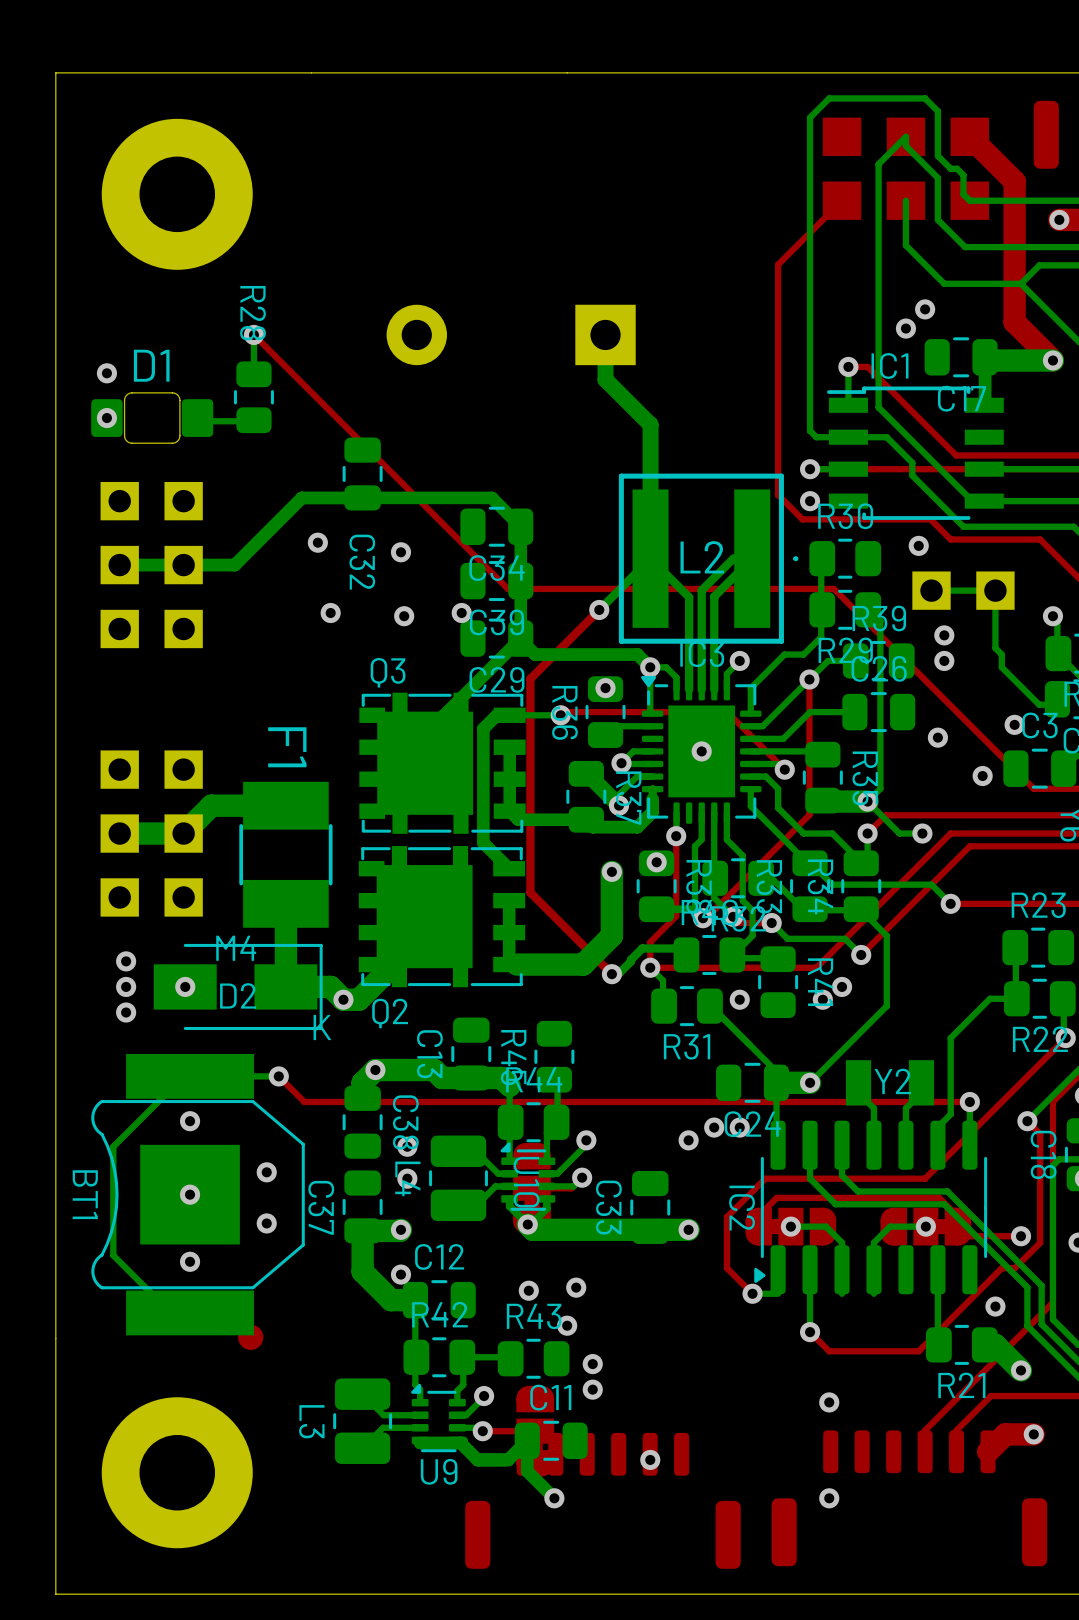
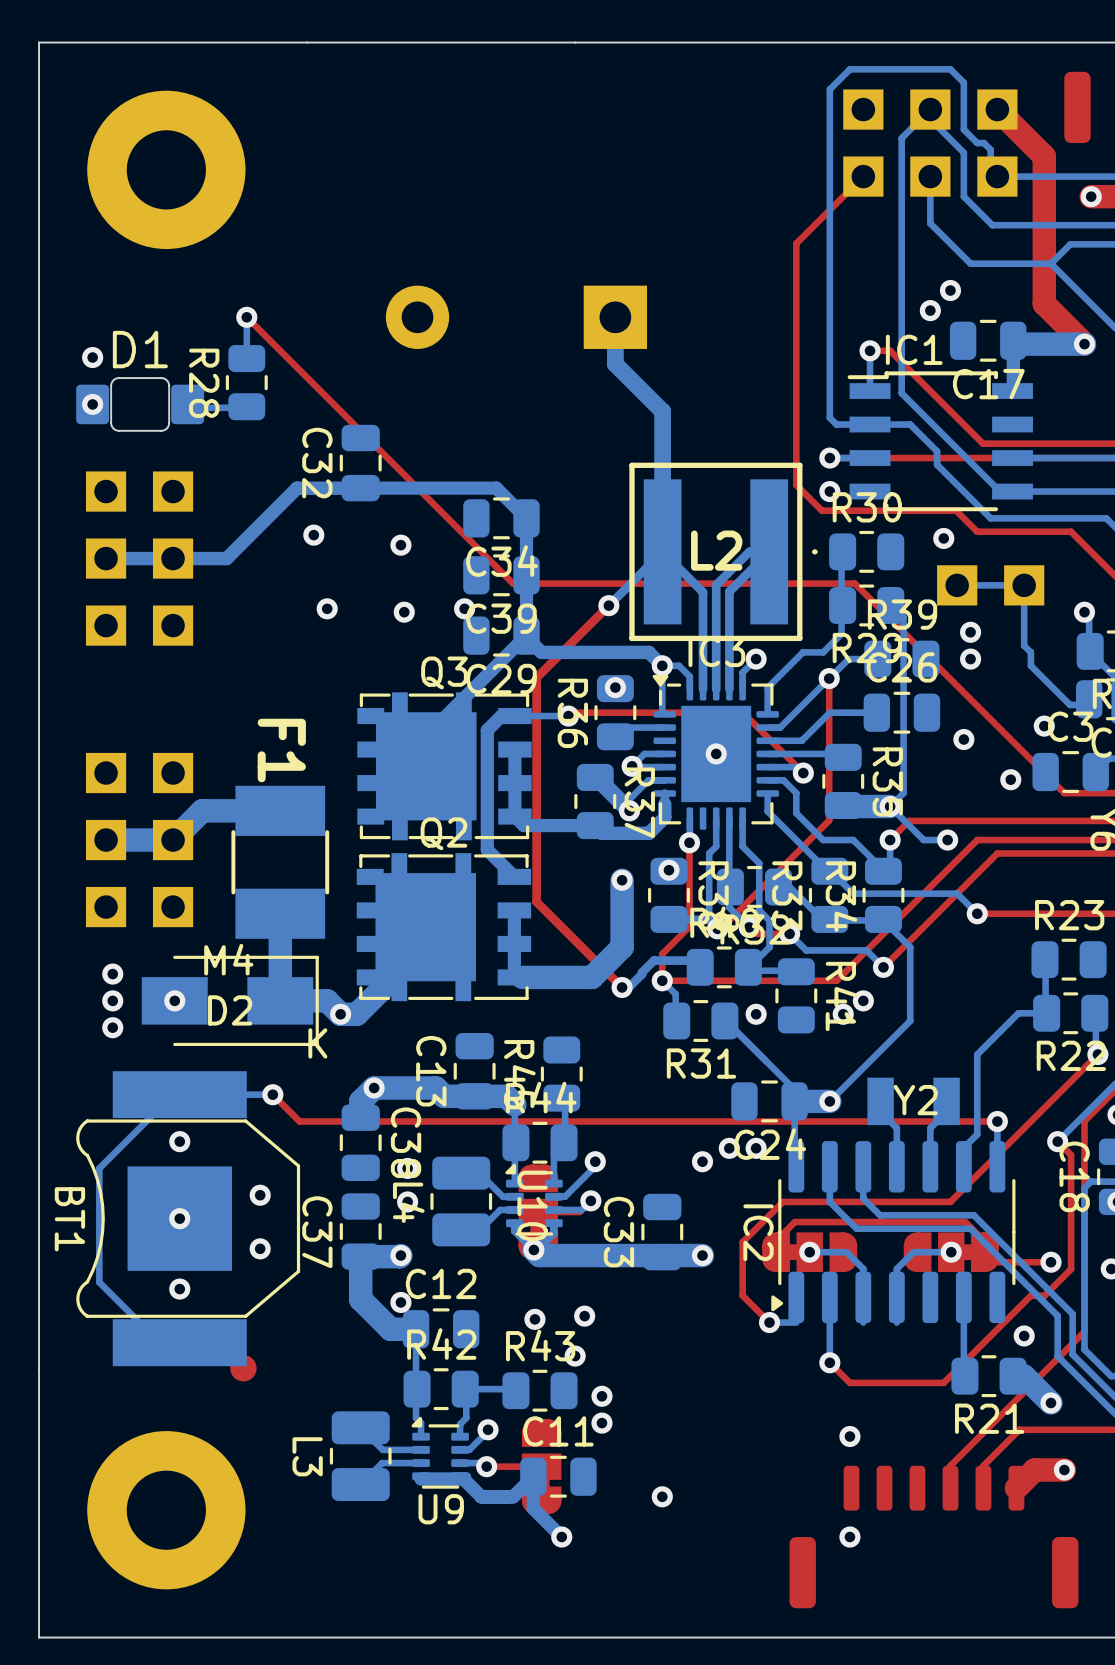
part footprint: [822, 117, 990, 220] -> [843, 89, 1018, 197]
R28 name position: R28 (253, 313) -> R28 (204, 383)
C32 name position: C32 (362, 562) -> C32 (317, 463)
Q3 name position: Q3 (388, 672) -> Q3 (444, 672)
Q2 name position: Q2 (390, 1013) -> Q2 (443, 833)
part: (602, 1500) -> none

